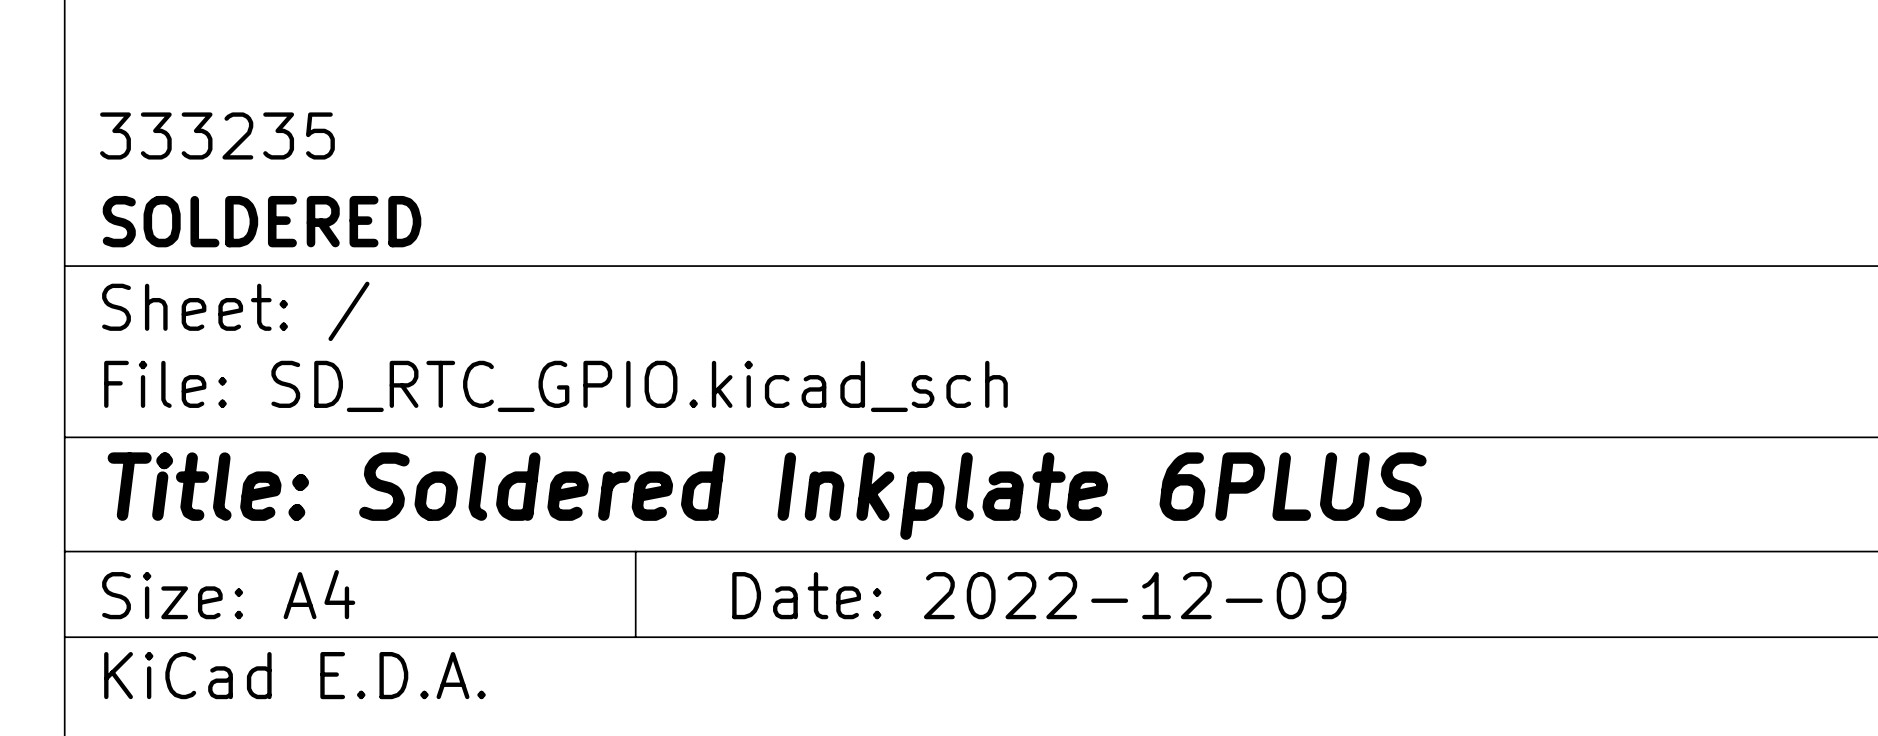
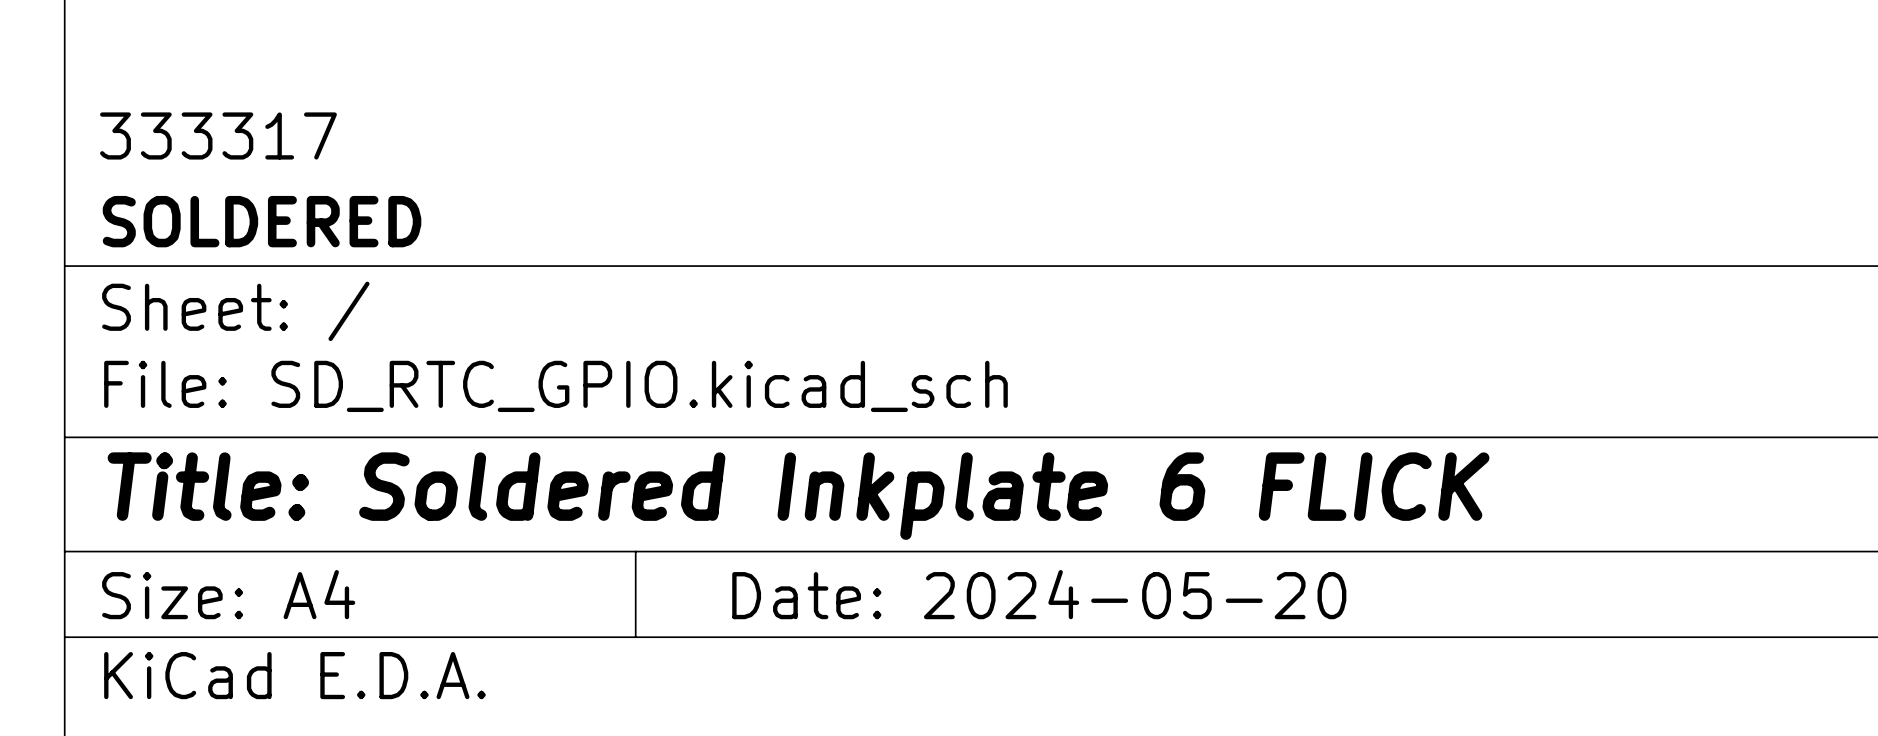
title block: 333235 (217, 135) -> 333317 (218, 135)
title block: Title: Soldered Inkplate 6PLUS (767, 496) -> Title: Soldered Inkplate 6 FLICK (798, 496)
title block: Date: 2022-12-09 (1039, 595) -> Date: 2024-05-20 (1039, 594)

